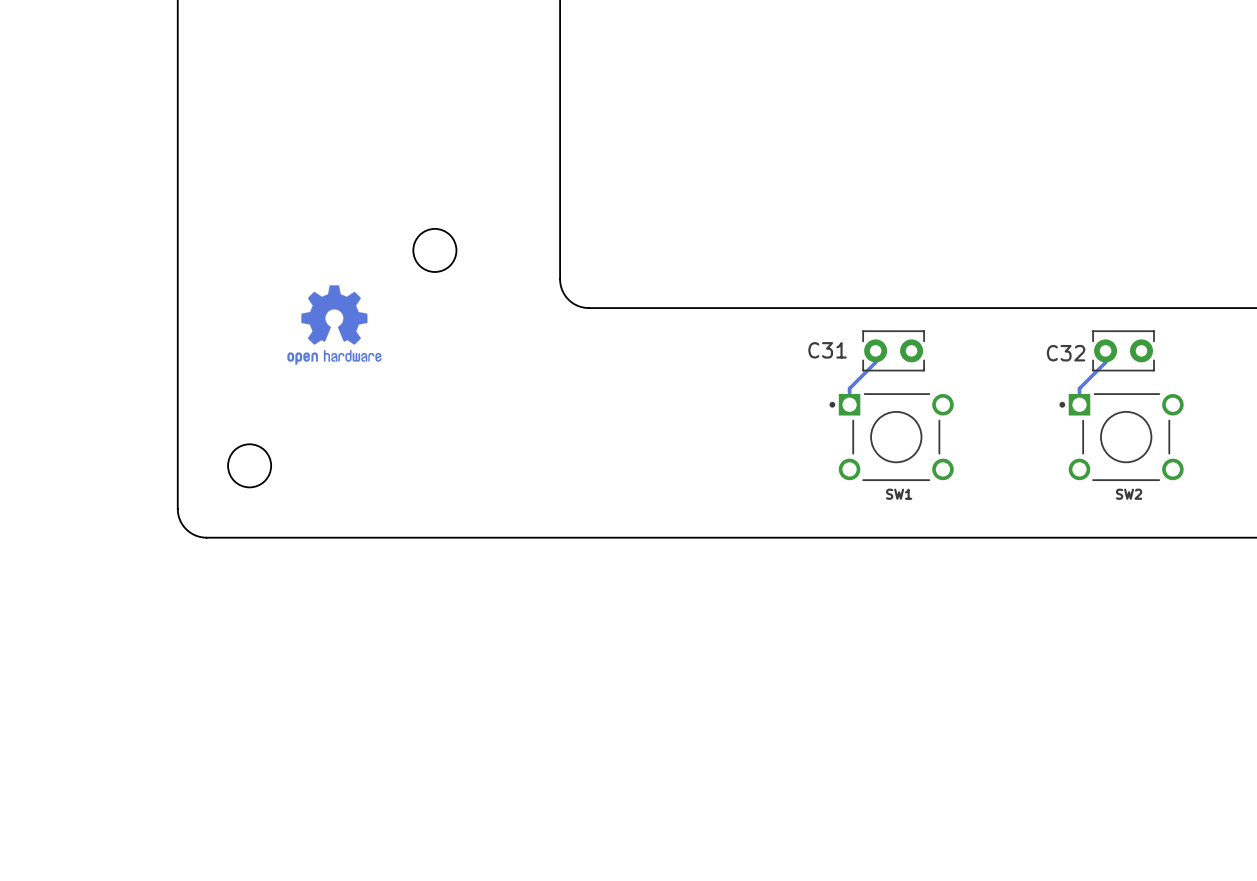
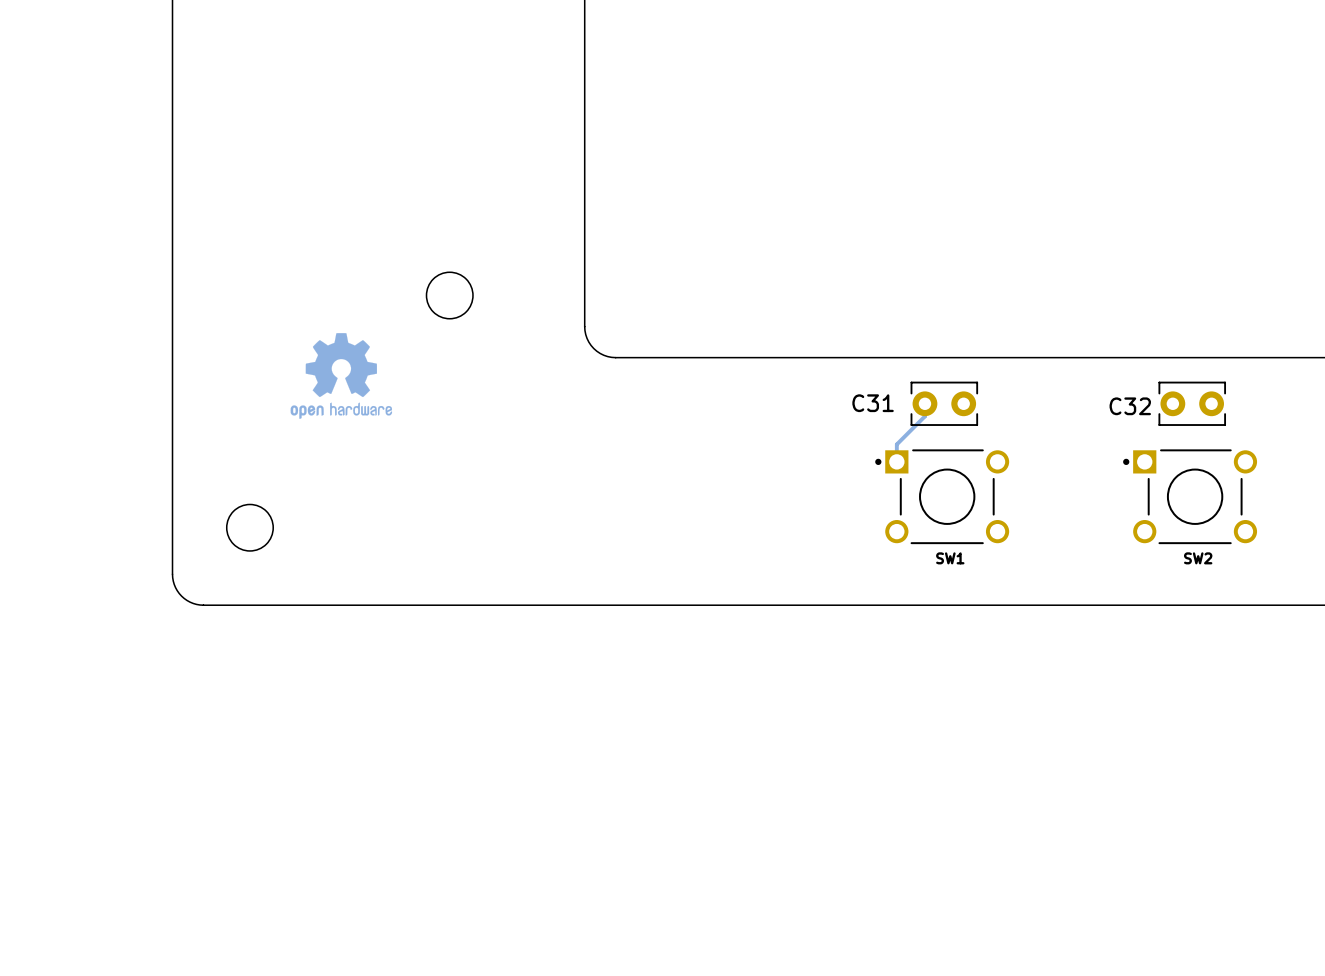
track: (1105, 350) (1105, 362) (1079, 388) (1079, 404) -> none

